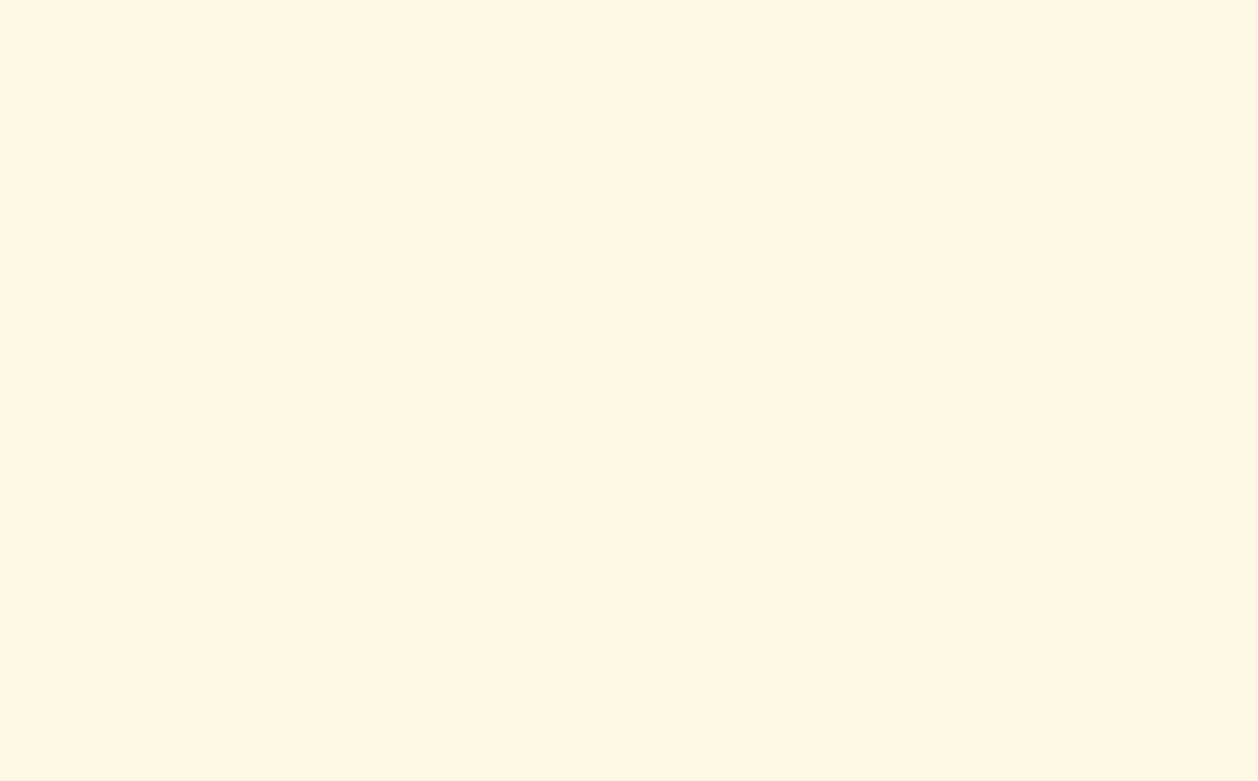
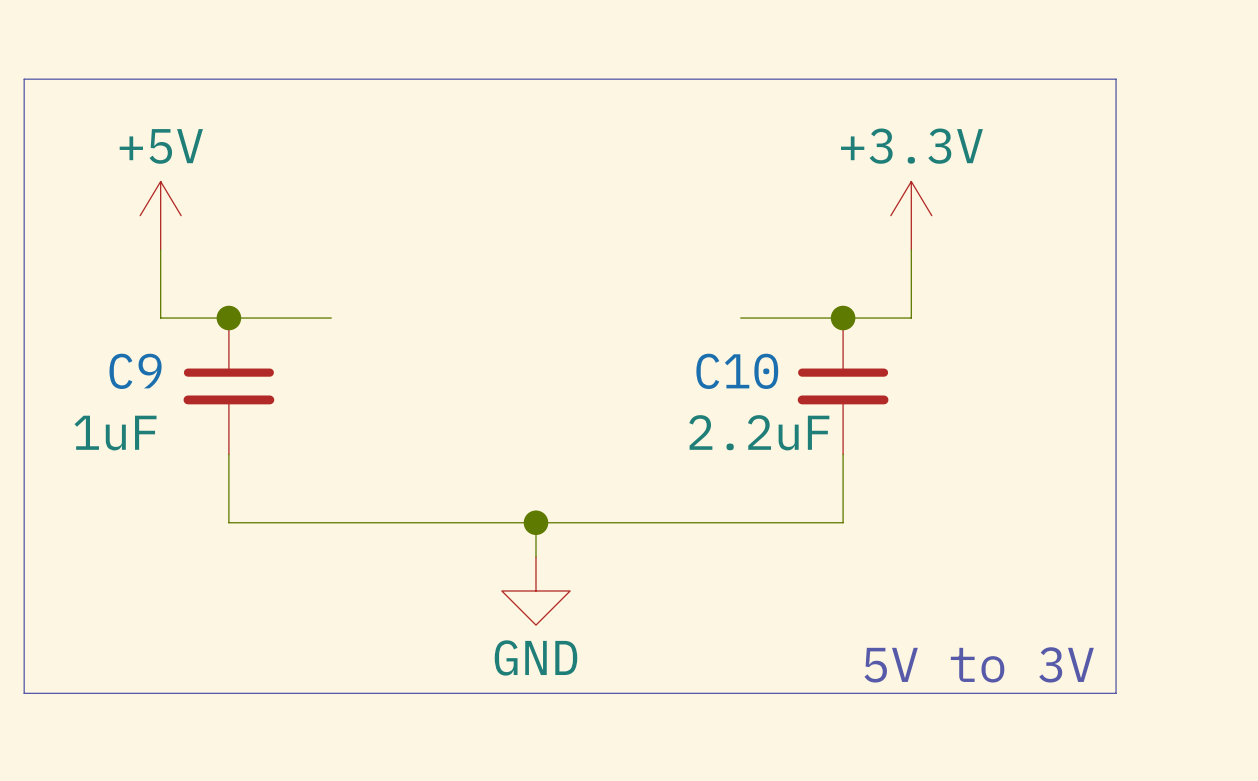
line: none -> (24, 79) (1116, 79) (1116, 693) (24, 693) (24, 79)
power symbol: none -> +5V (160, 215)
power symbol: none -> +3.3V (911, 215)
wire: none -> (160, 249) (160, 318) (331, 318)
wire: none -> (911, 249) (911, 318) (740, 318)
junction: none -> (228, 318)
junction: none -> (843, 318)
C9: none -> 1uF (228, 386)
C10: none -> 2.2uF (843, 386)
wire: none -> (228, 454) (228, 522) (843, 522) (843, 454)
wire: none -> (535, 522) (535, 556)
junction: none -> (535, 522)
power symbol: none -> GND (535, 590)
text: none -> 5V to 3V (979, 664)

